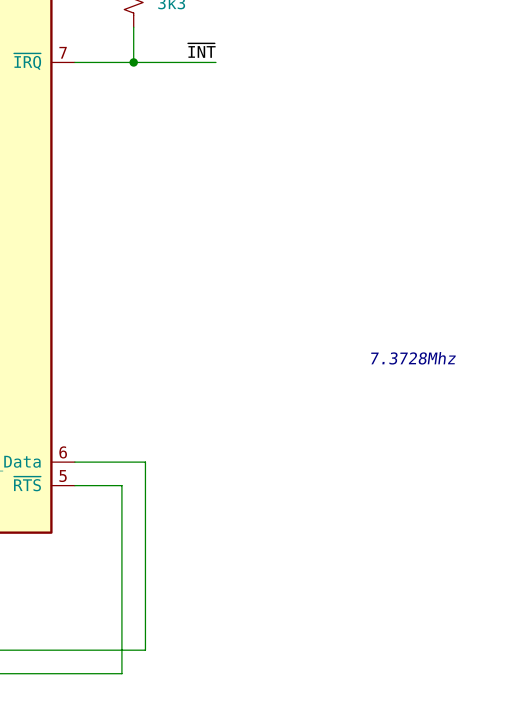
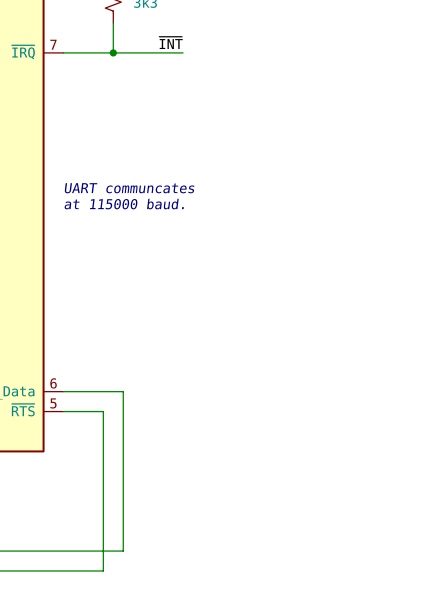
text: none -> UART communcates (129, 188)
text: none -> at 115000 baud. (124, 204)
text: 7.3728Mhz (413, 358) -> none

